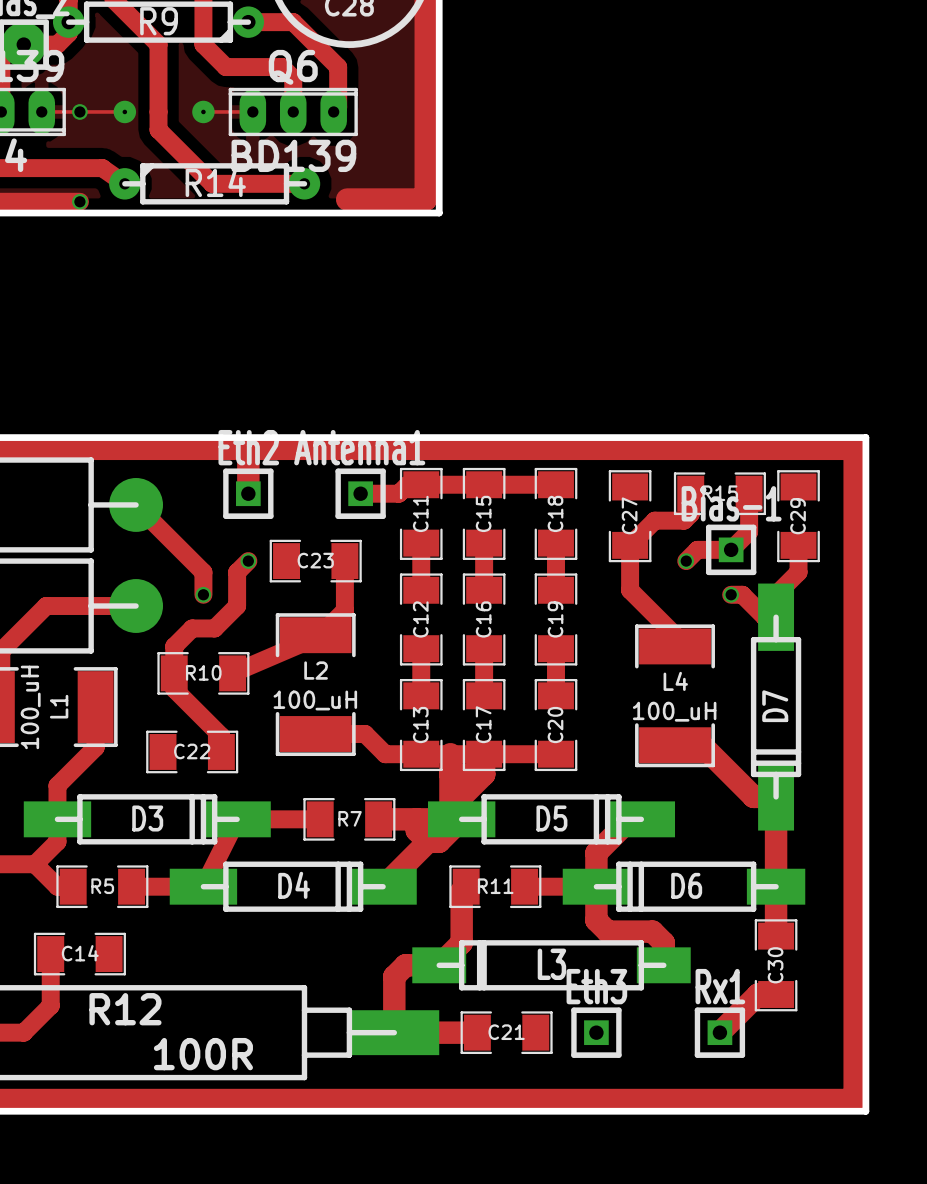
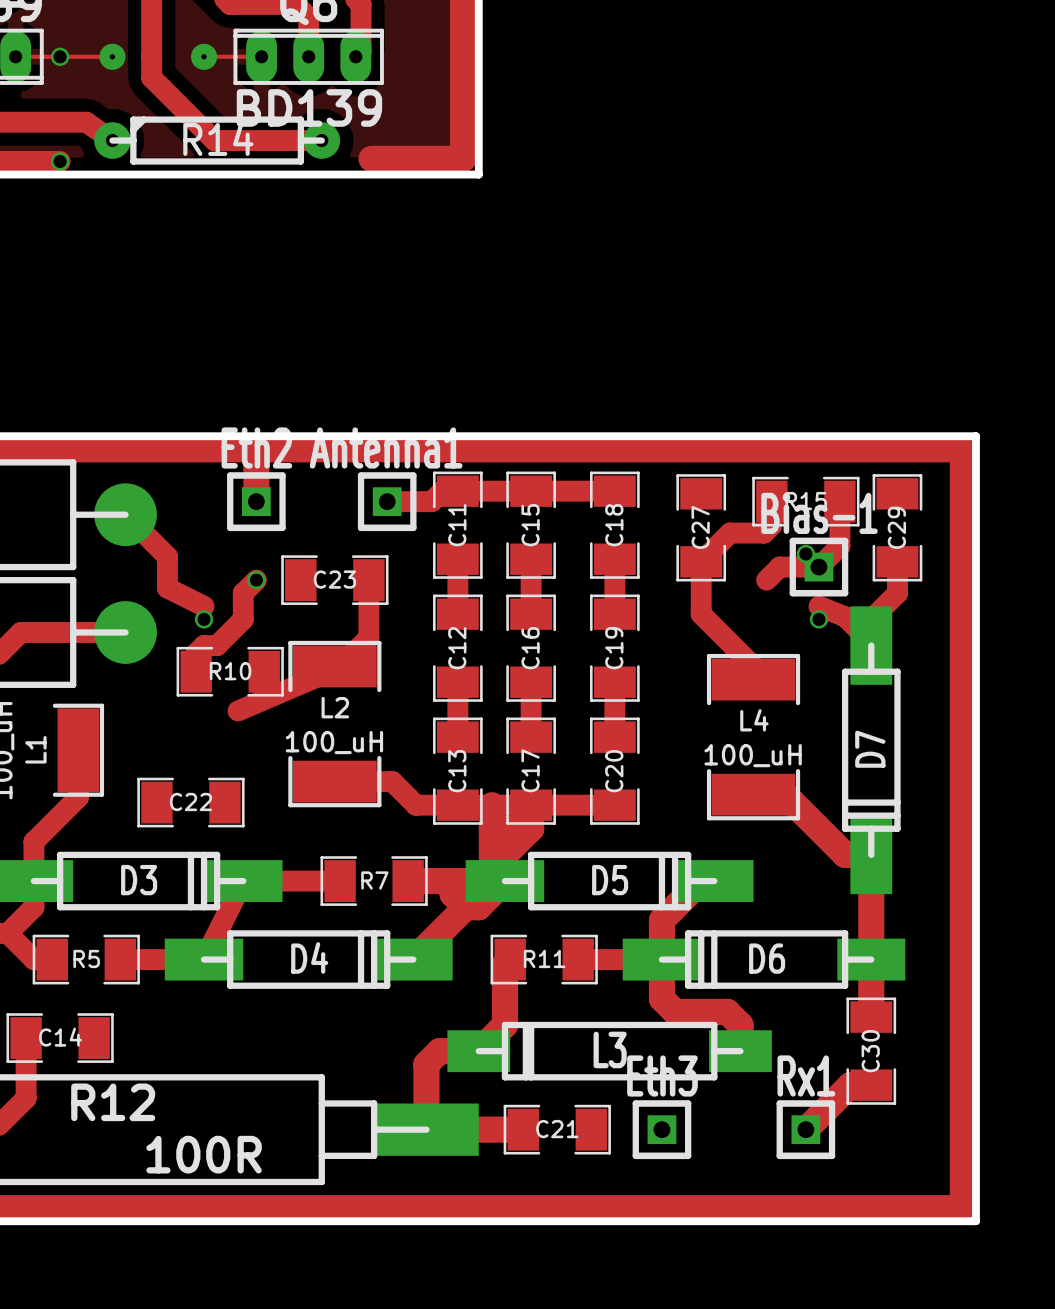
track: (171, 540) (203, 572) (203, 594) -> (167, 556) (167, 588) (204, 606)
via position: (686, 561) -> (805, 553)
track: none -> (818, 606) (845, 616) (871, 642)
track: (237, 594) (237, 606) (214, 628) (192, 628) (174, 646) (174, 689) (221, 736) (221, 751) -> (243, 619) (217, 645) (204, 645) (196, 653) (196, 671)
track: (731, 594) (742, 594) (764, 617) (776, 617) -> none
R10 position: (203, 673) -> (230, 671)

